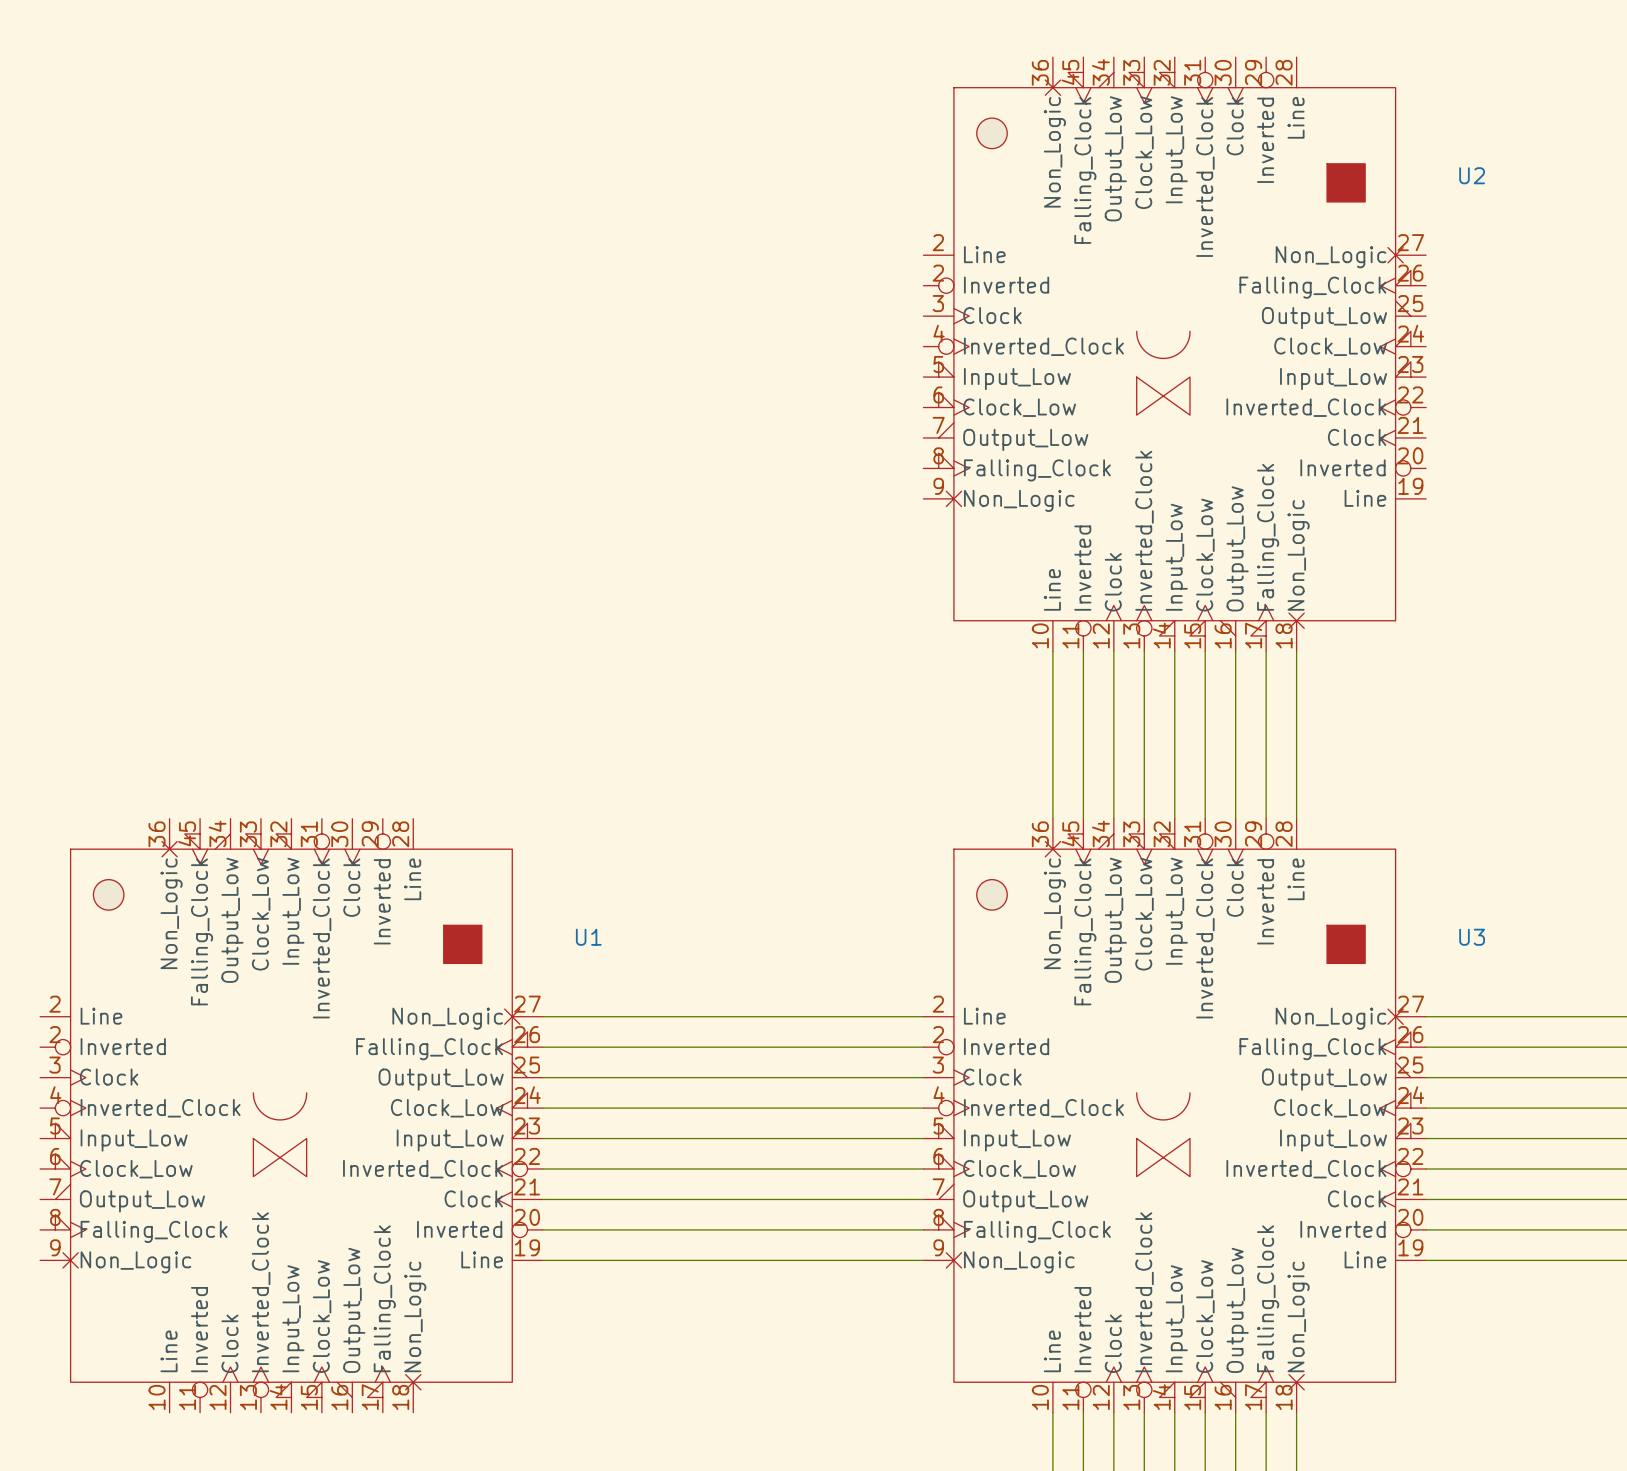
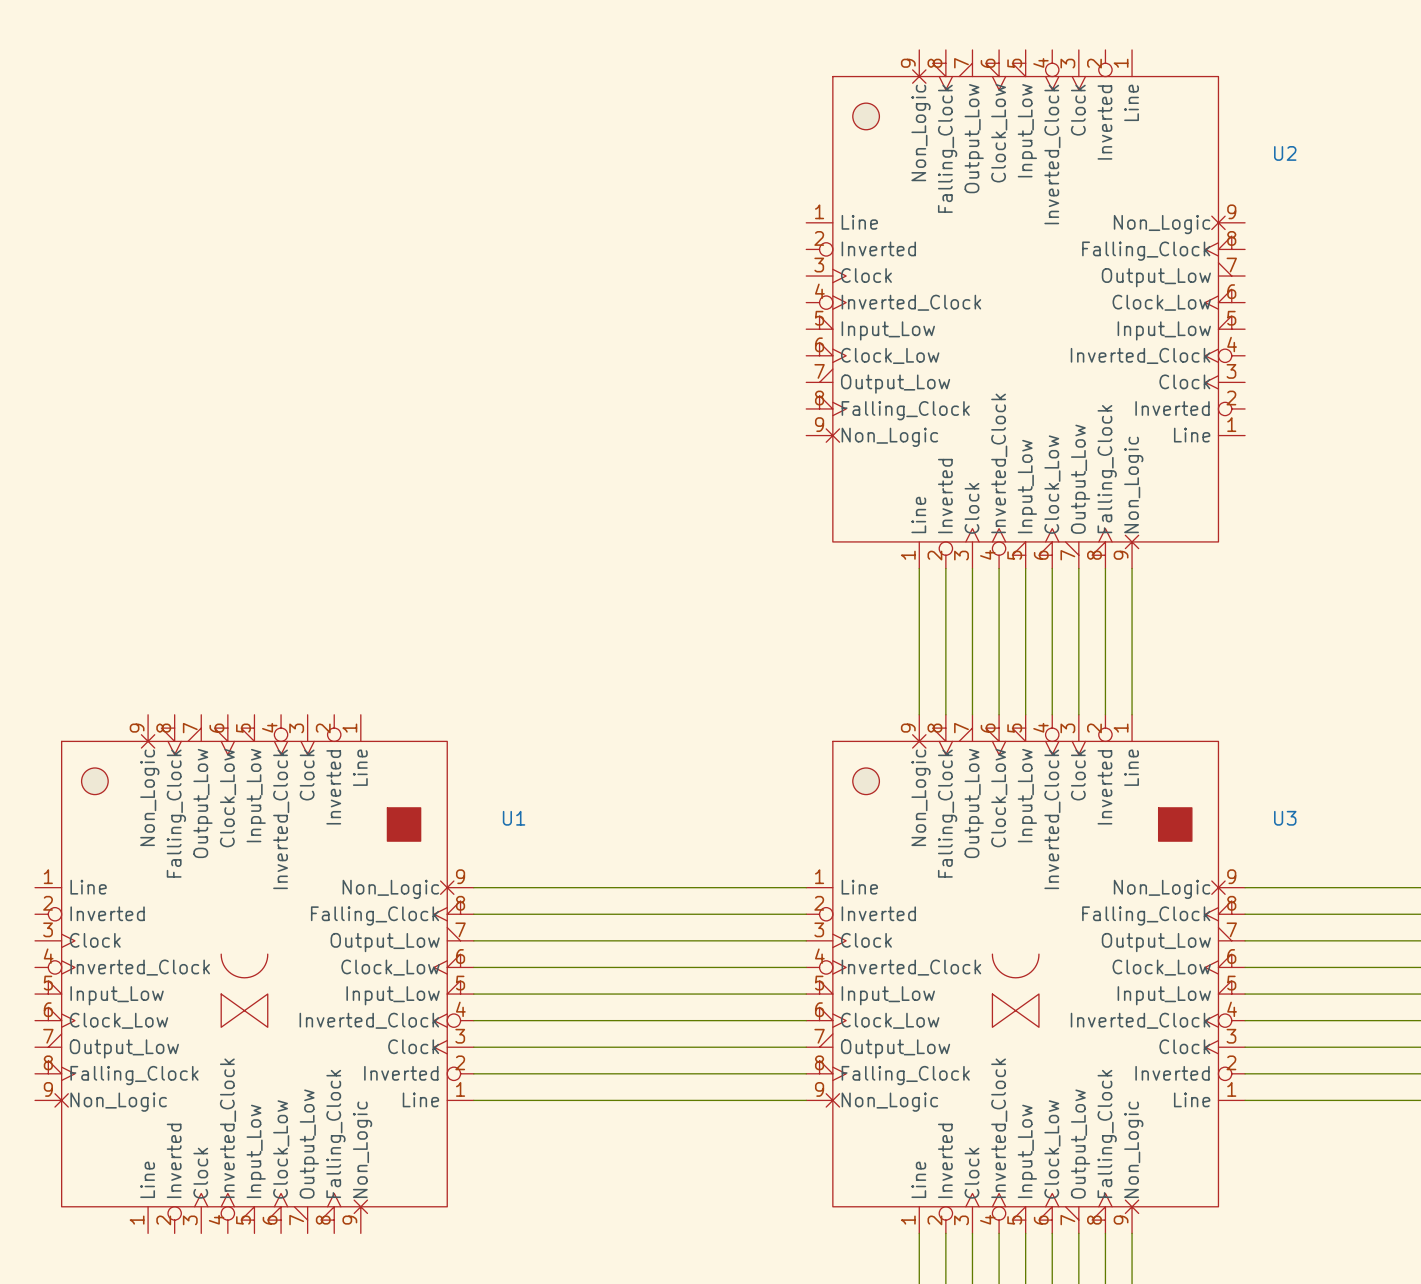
U2 symbol: [923, 57, 1427, 652] -> [806, 49, 1246, 569]
U1 symbol: [40, 818, 543, 1413] -> [35, 714, 474, 1234]
U3 symbol: [923, 818, 1427, 1413] -> [806, 714, 1246, 1234]

